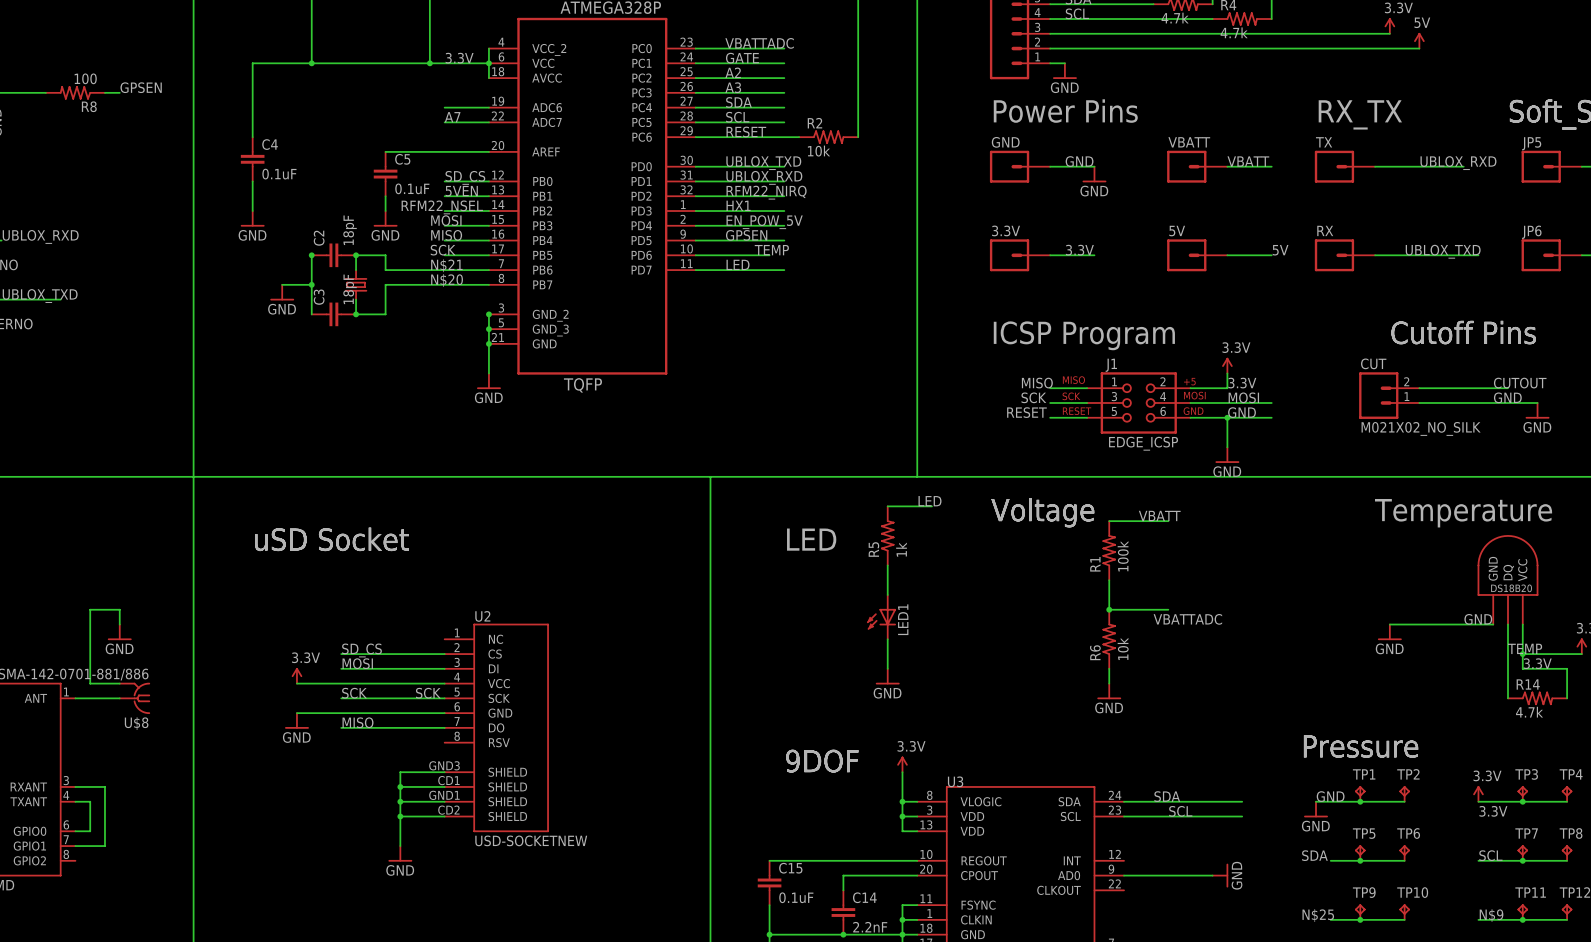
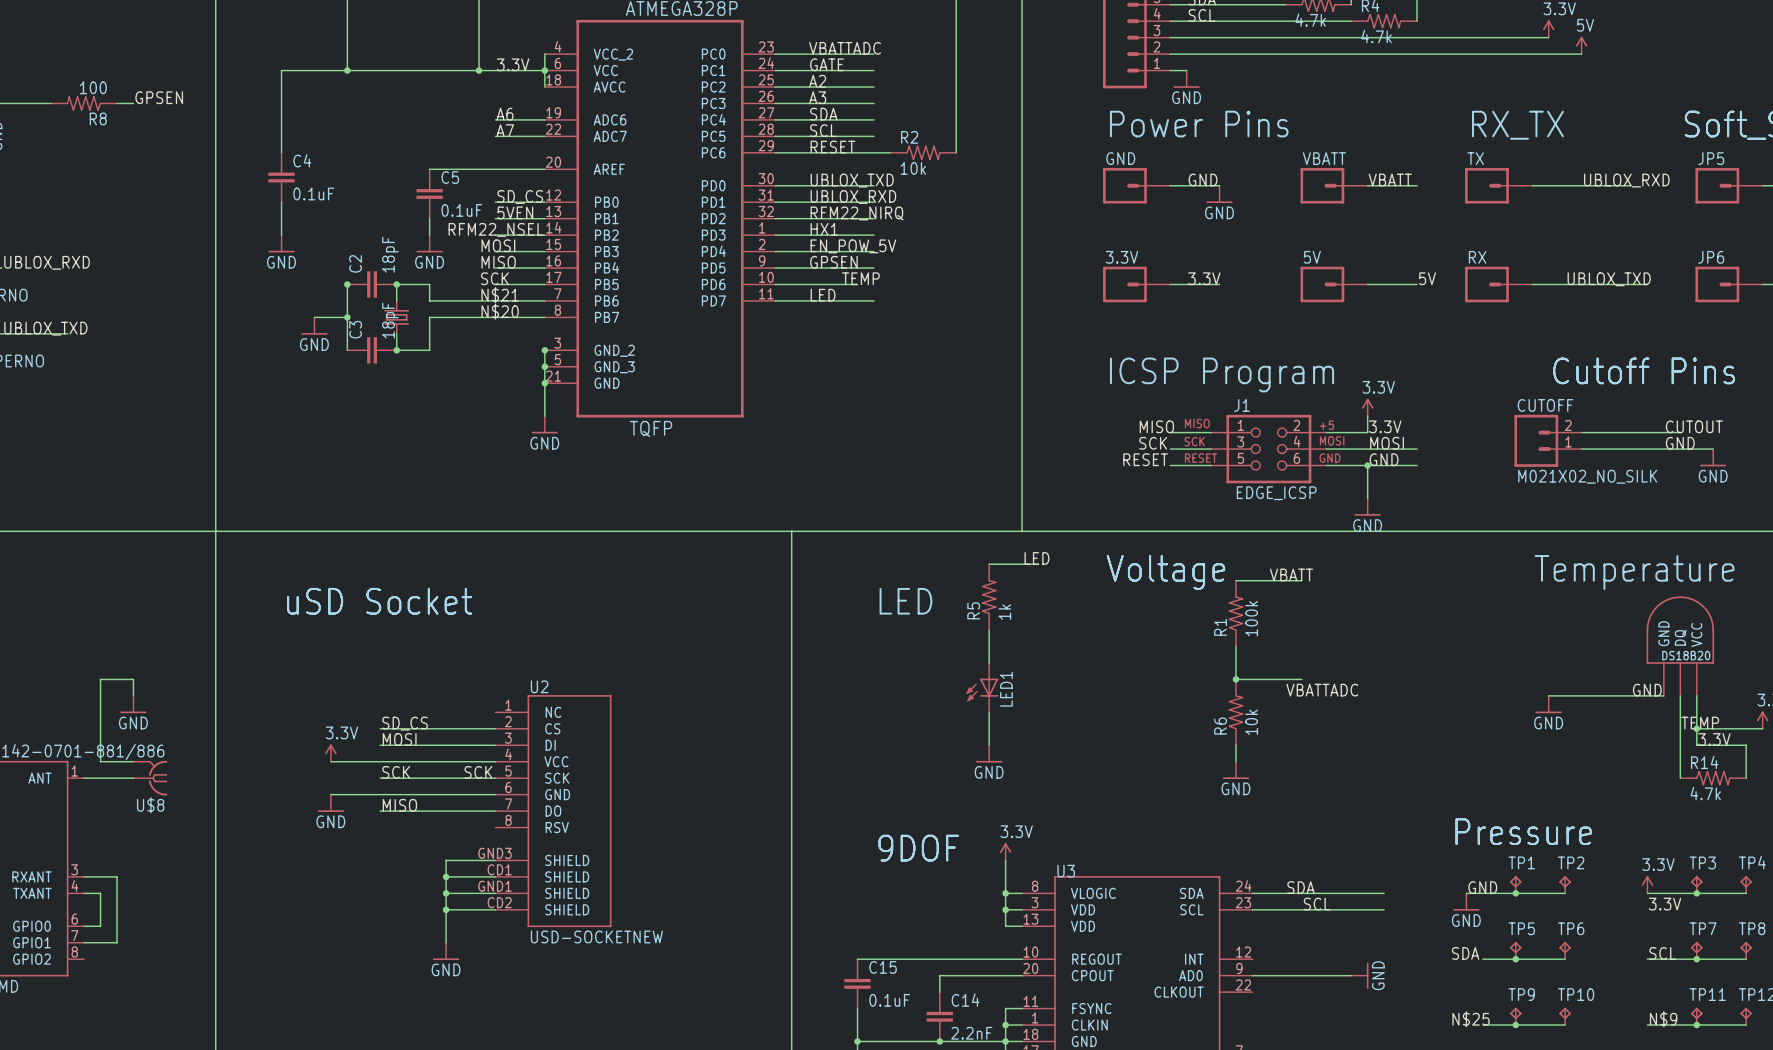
label: none -> A6 (504, 114)
CUT name: CUT (1373, 363) -> CUTOFF (1545, 405)

